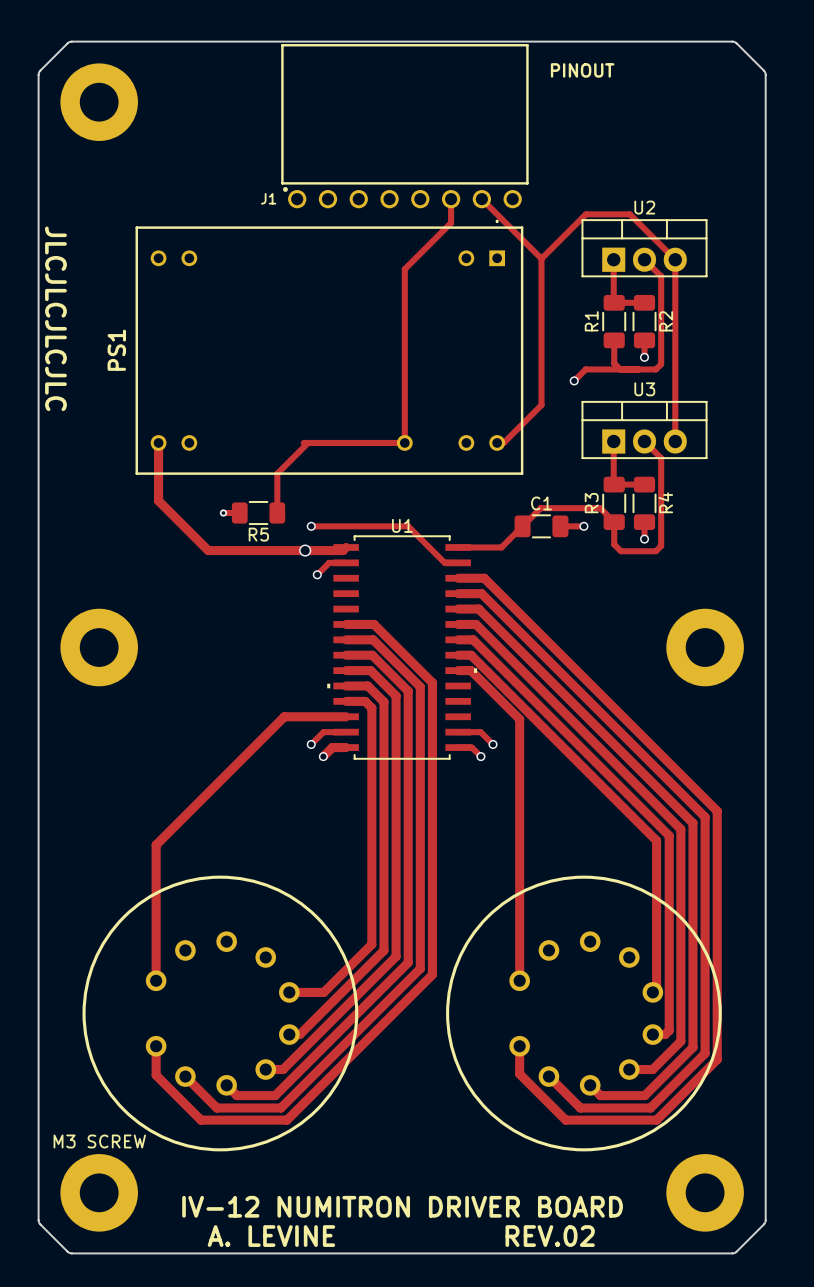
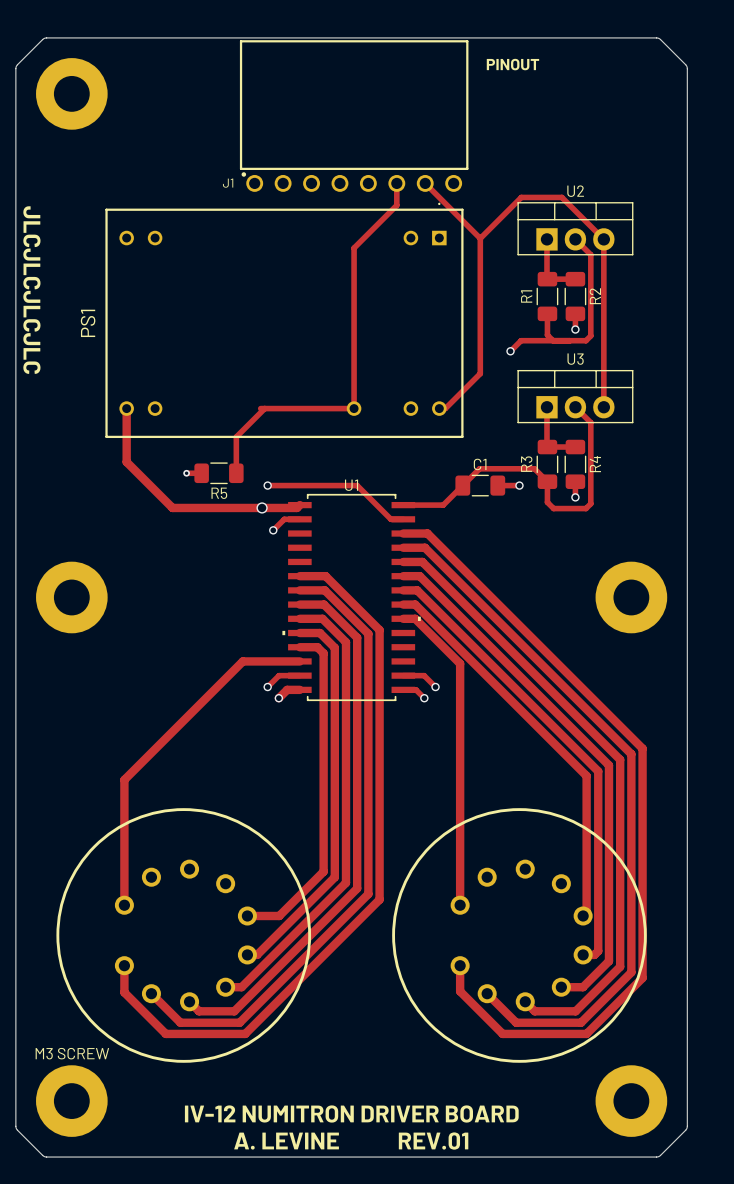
text: A. LEVINE REV.02 (401, 1236) -> A. LEVINE REV.01 (351, 1141)

